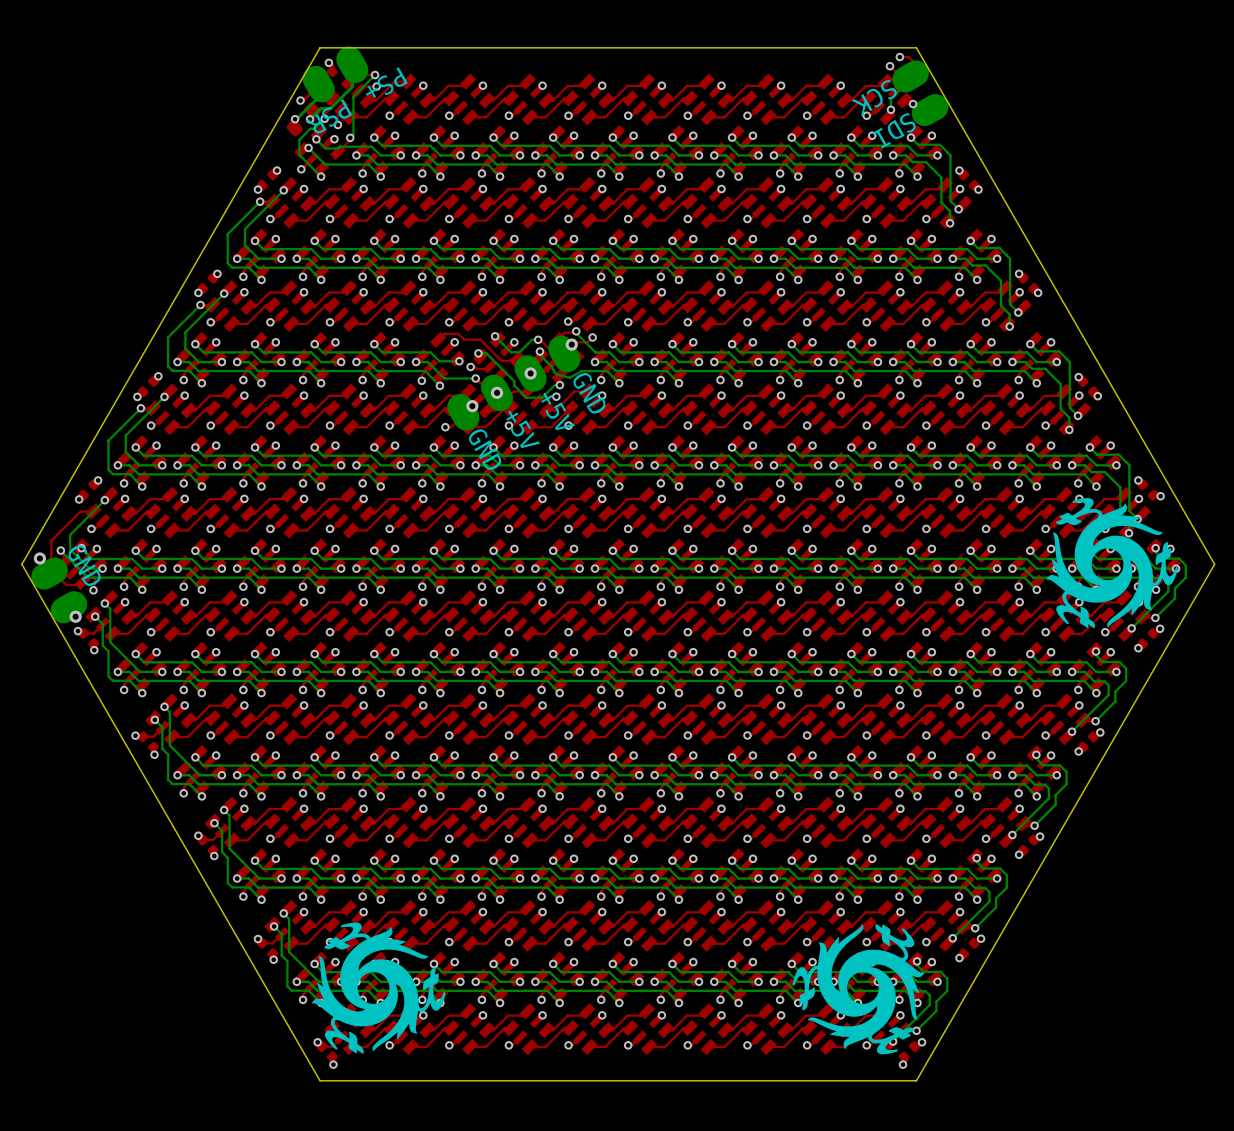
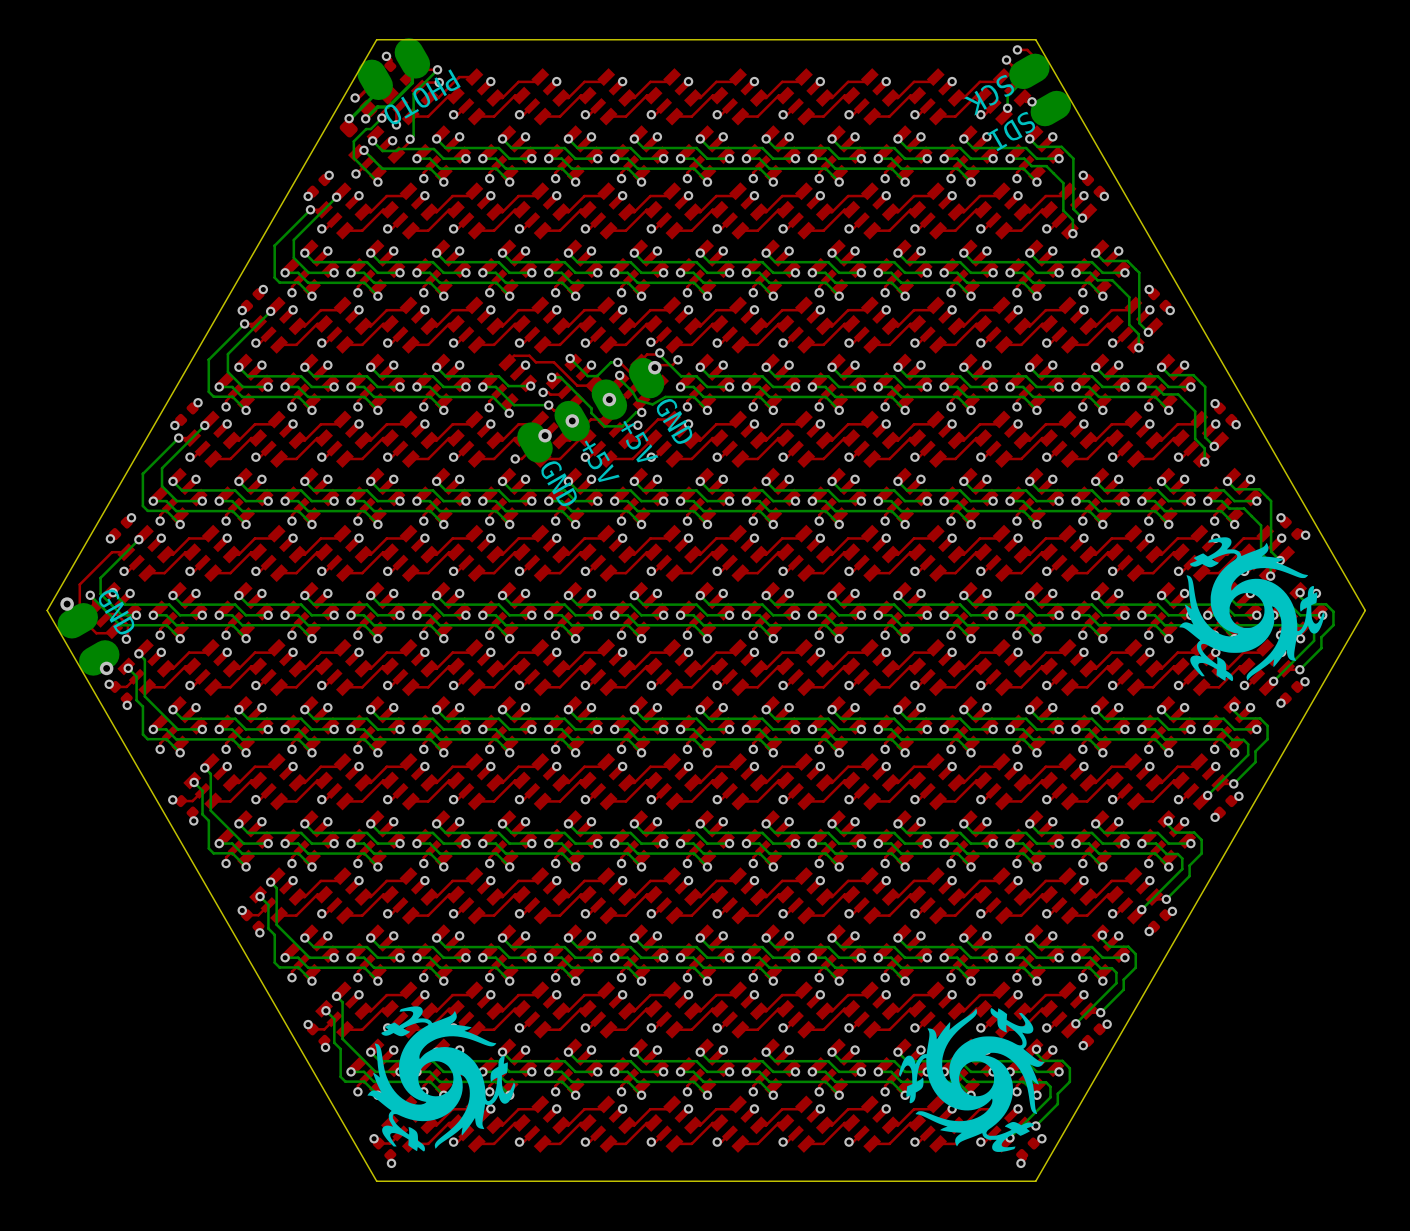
text: PS+ (386, 82) -> PHOTO (422, 97)
text: PSR (329, 116) -> none

